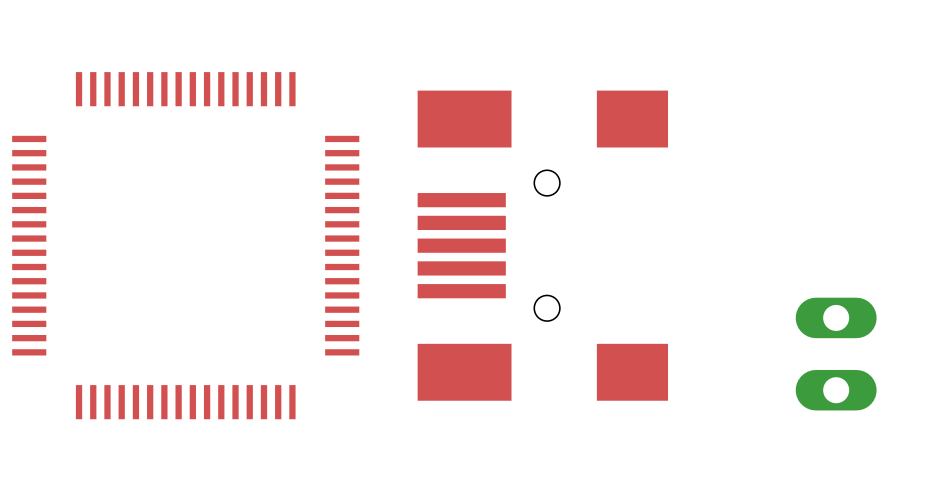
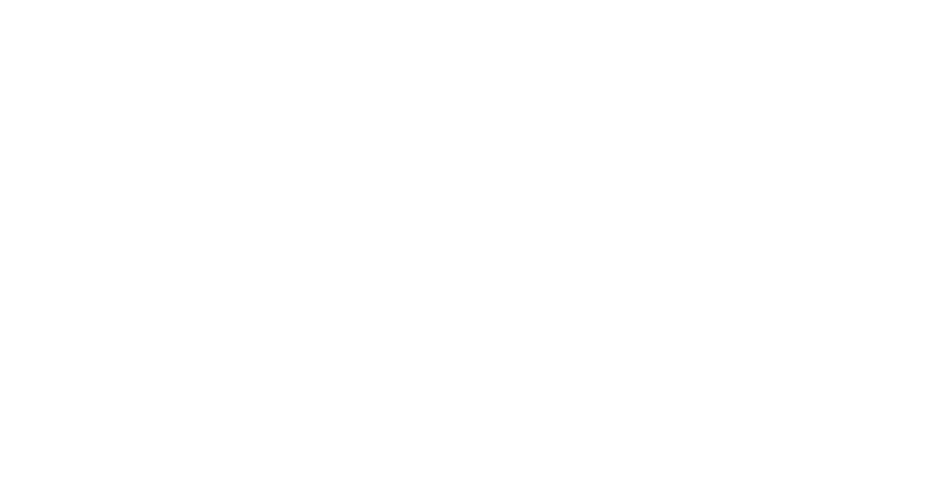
part: (185, 245) -> none
part: (542, 245) -> none
part: (836, 354) -> none

